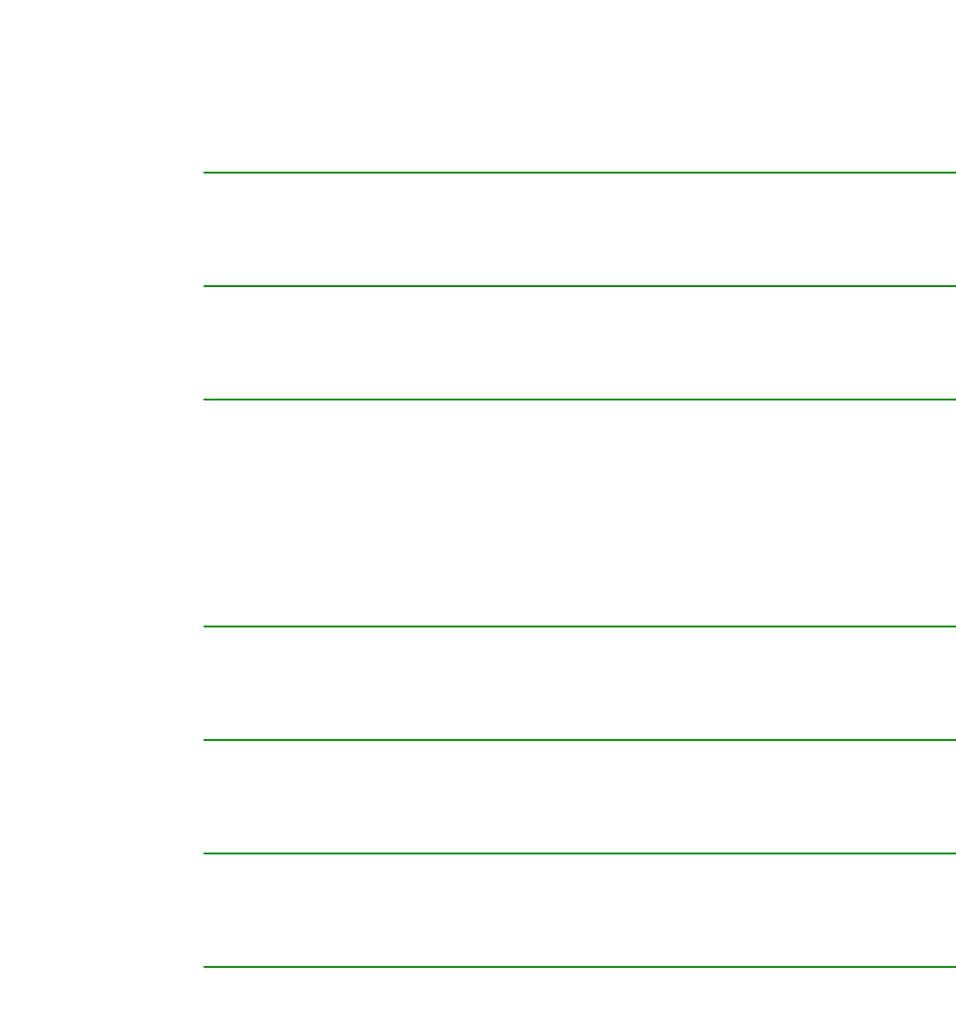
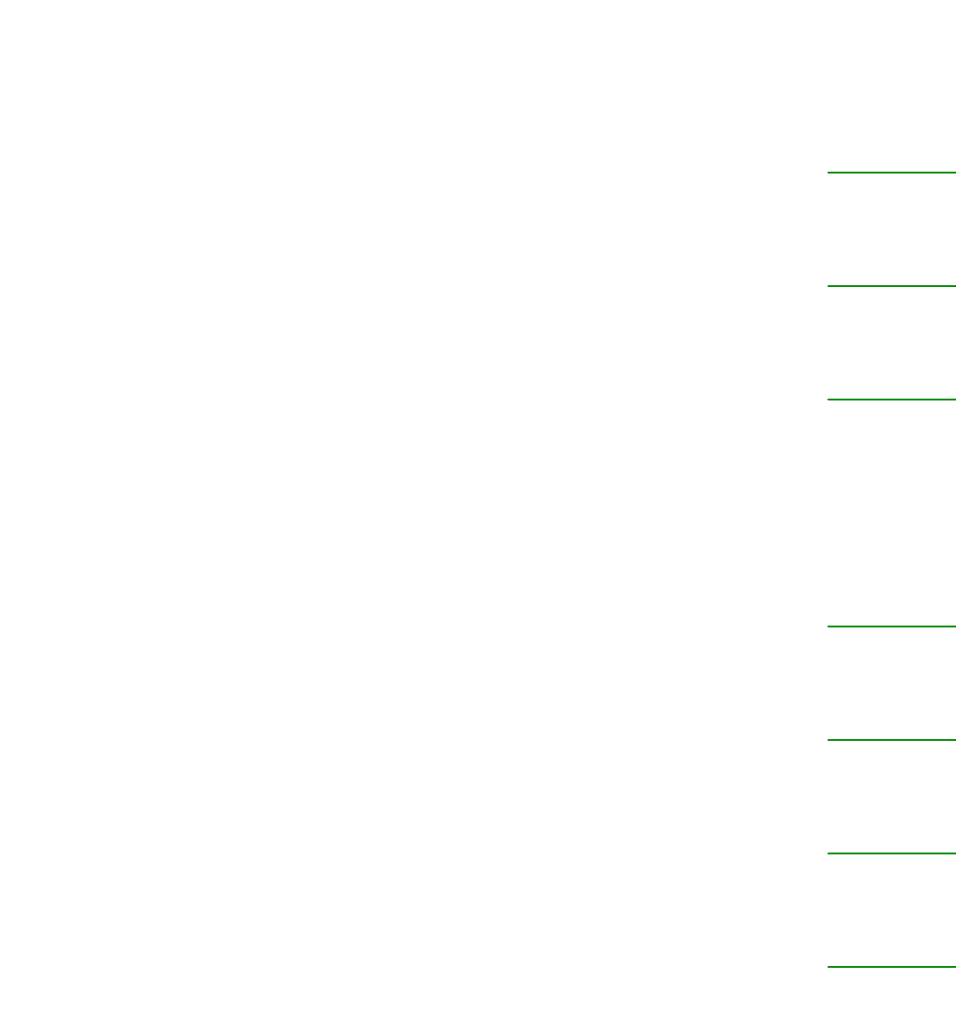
wire: (204, 172) (828, 172) -> none
wire: (204, 286) (828, 286) -> none
wire: (204, 399) (828, 399) -> none
wire: (204, 626) (828, 626) -> none
wire: (204, 739) (828, 739) -> none
wire: (204, 853) (828, 853) -> none
wire: (204, 966) (828, 966) -> none

